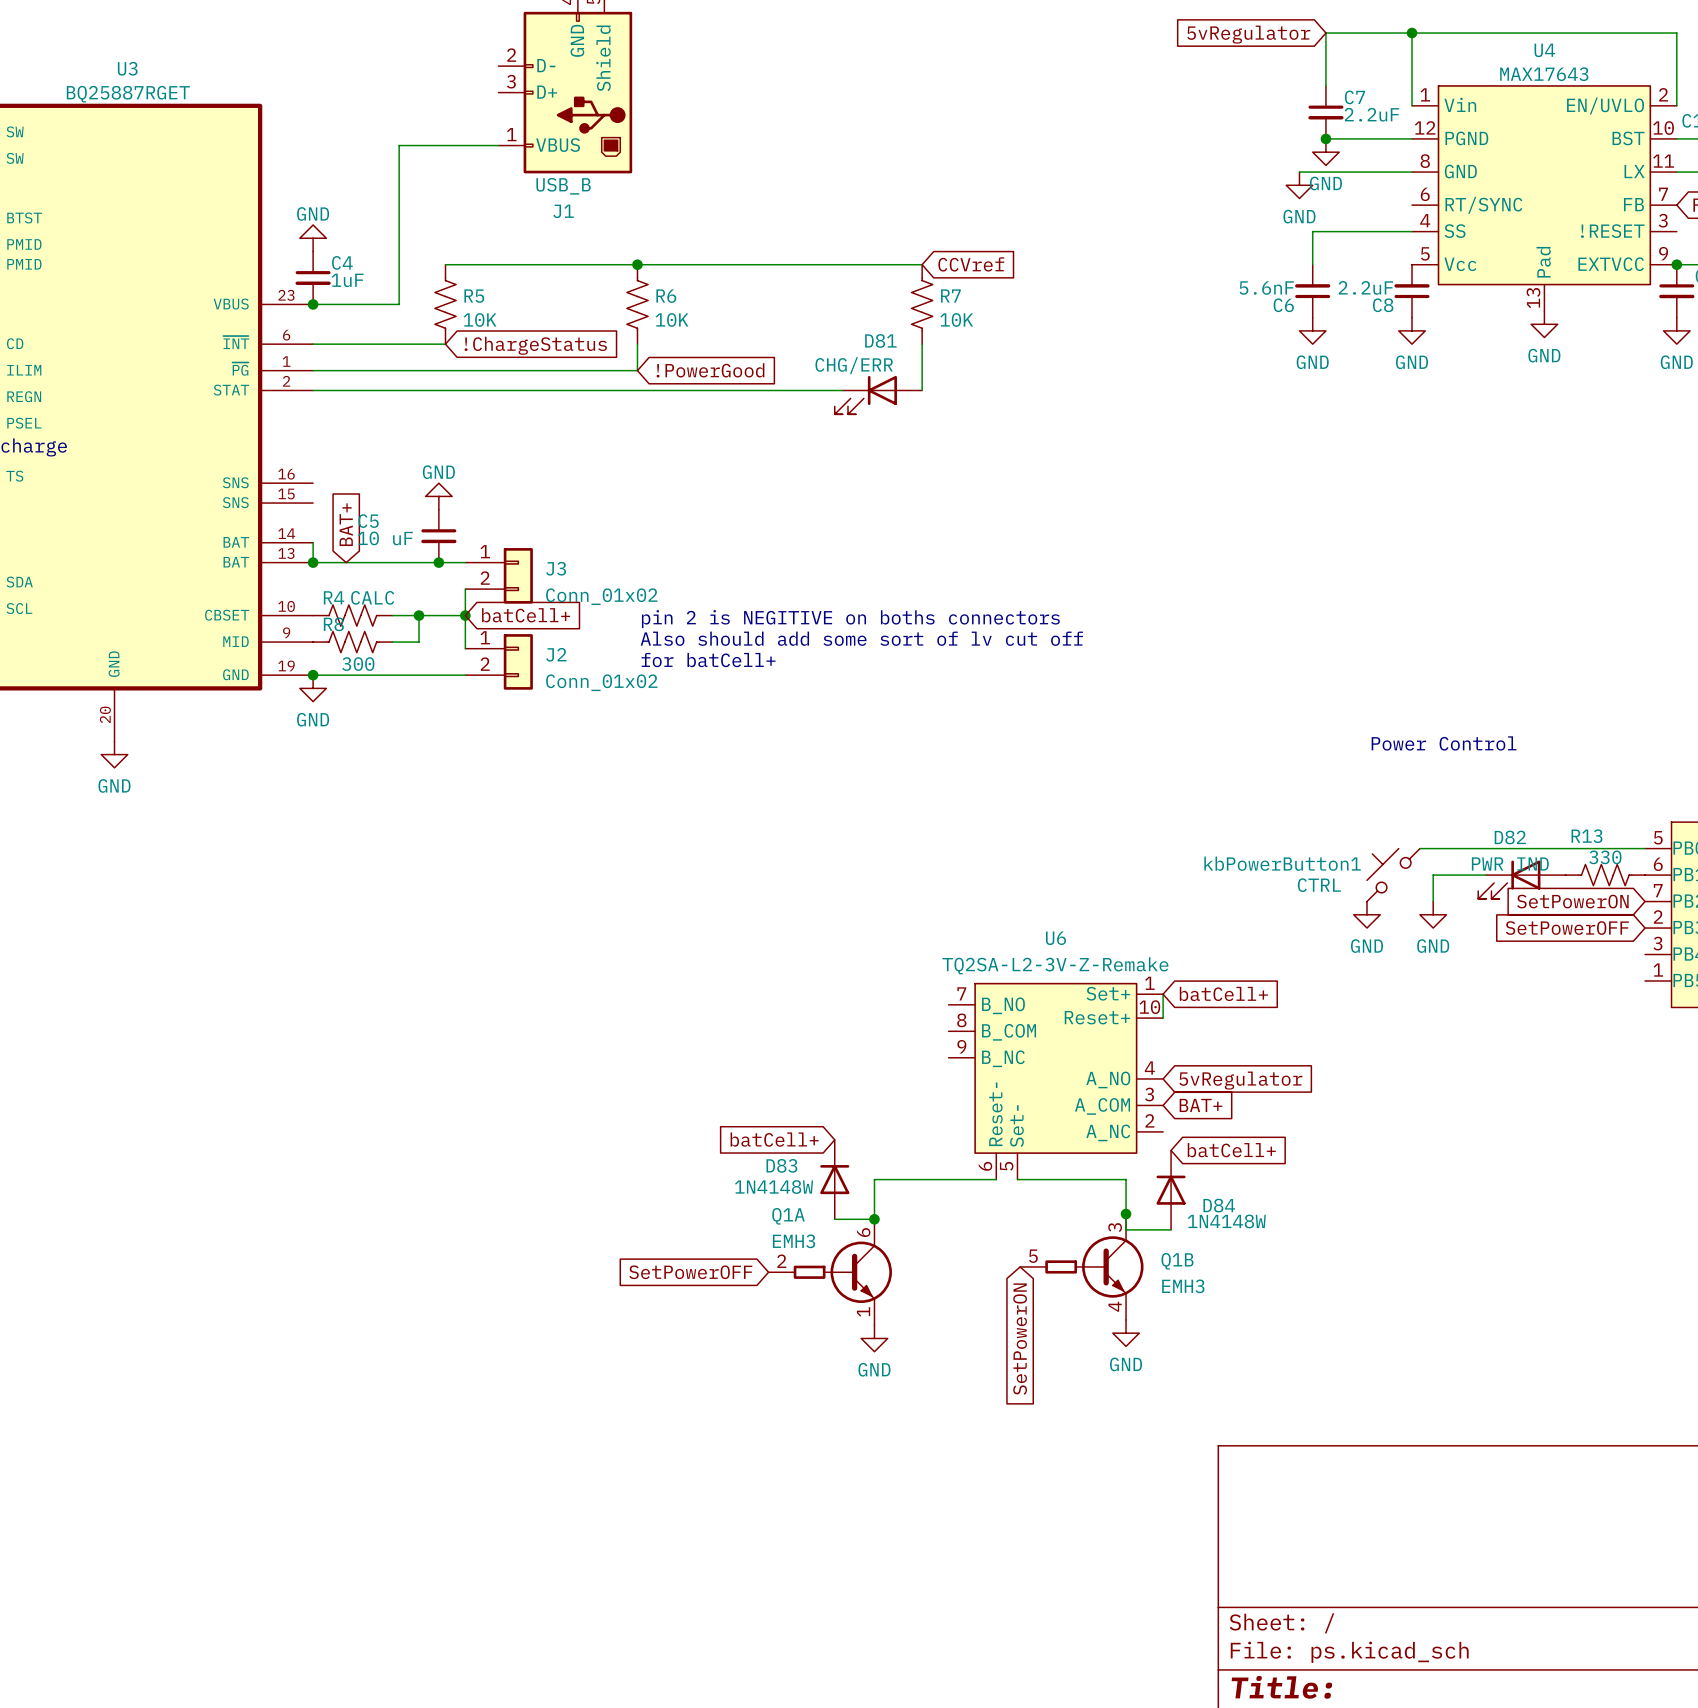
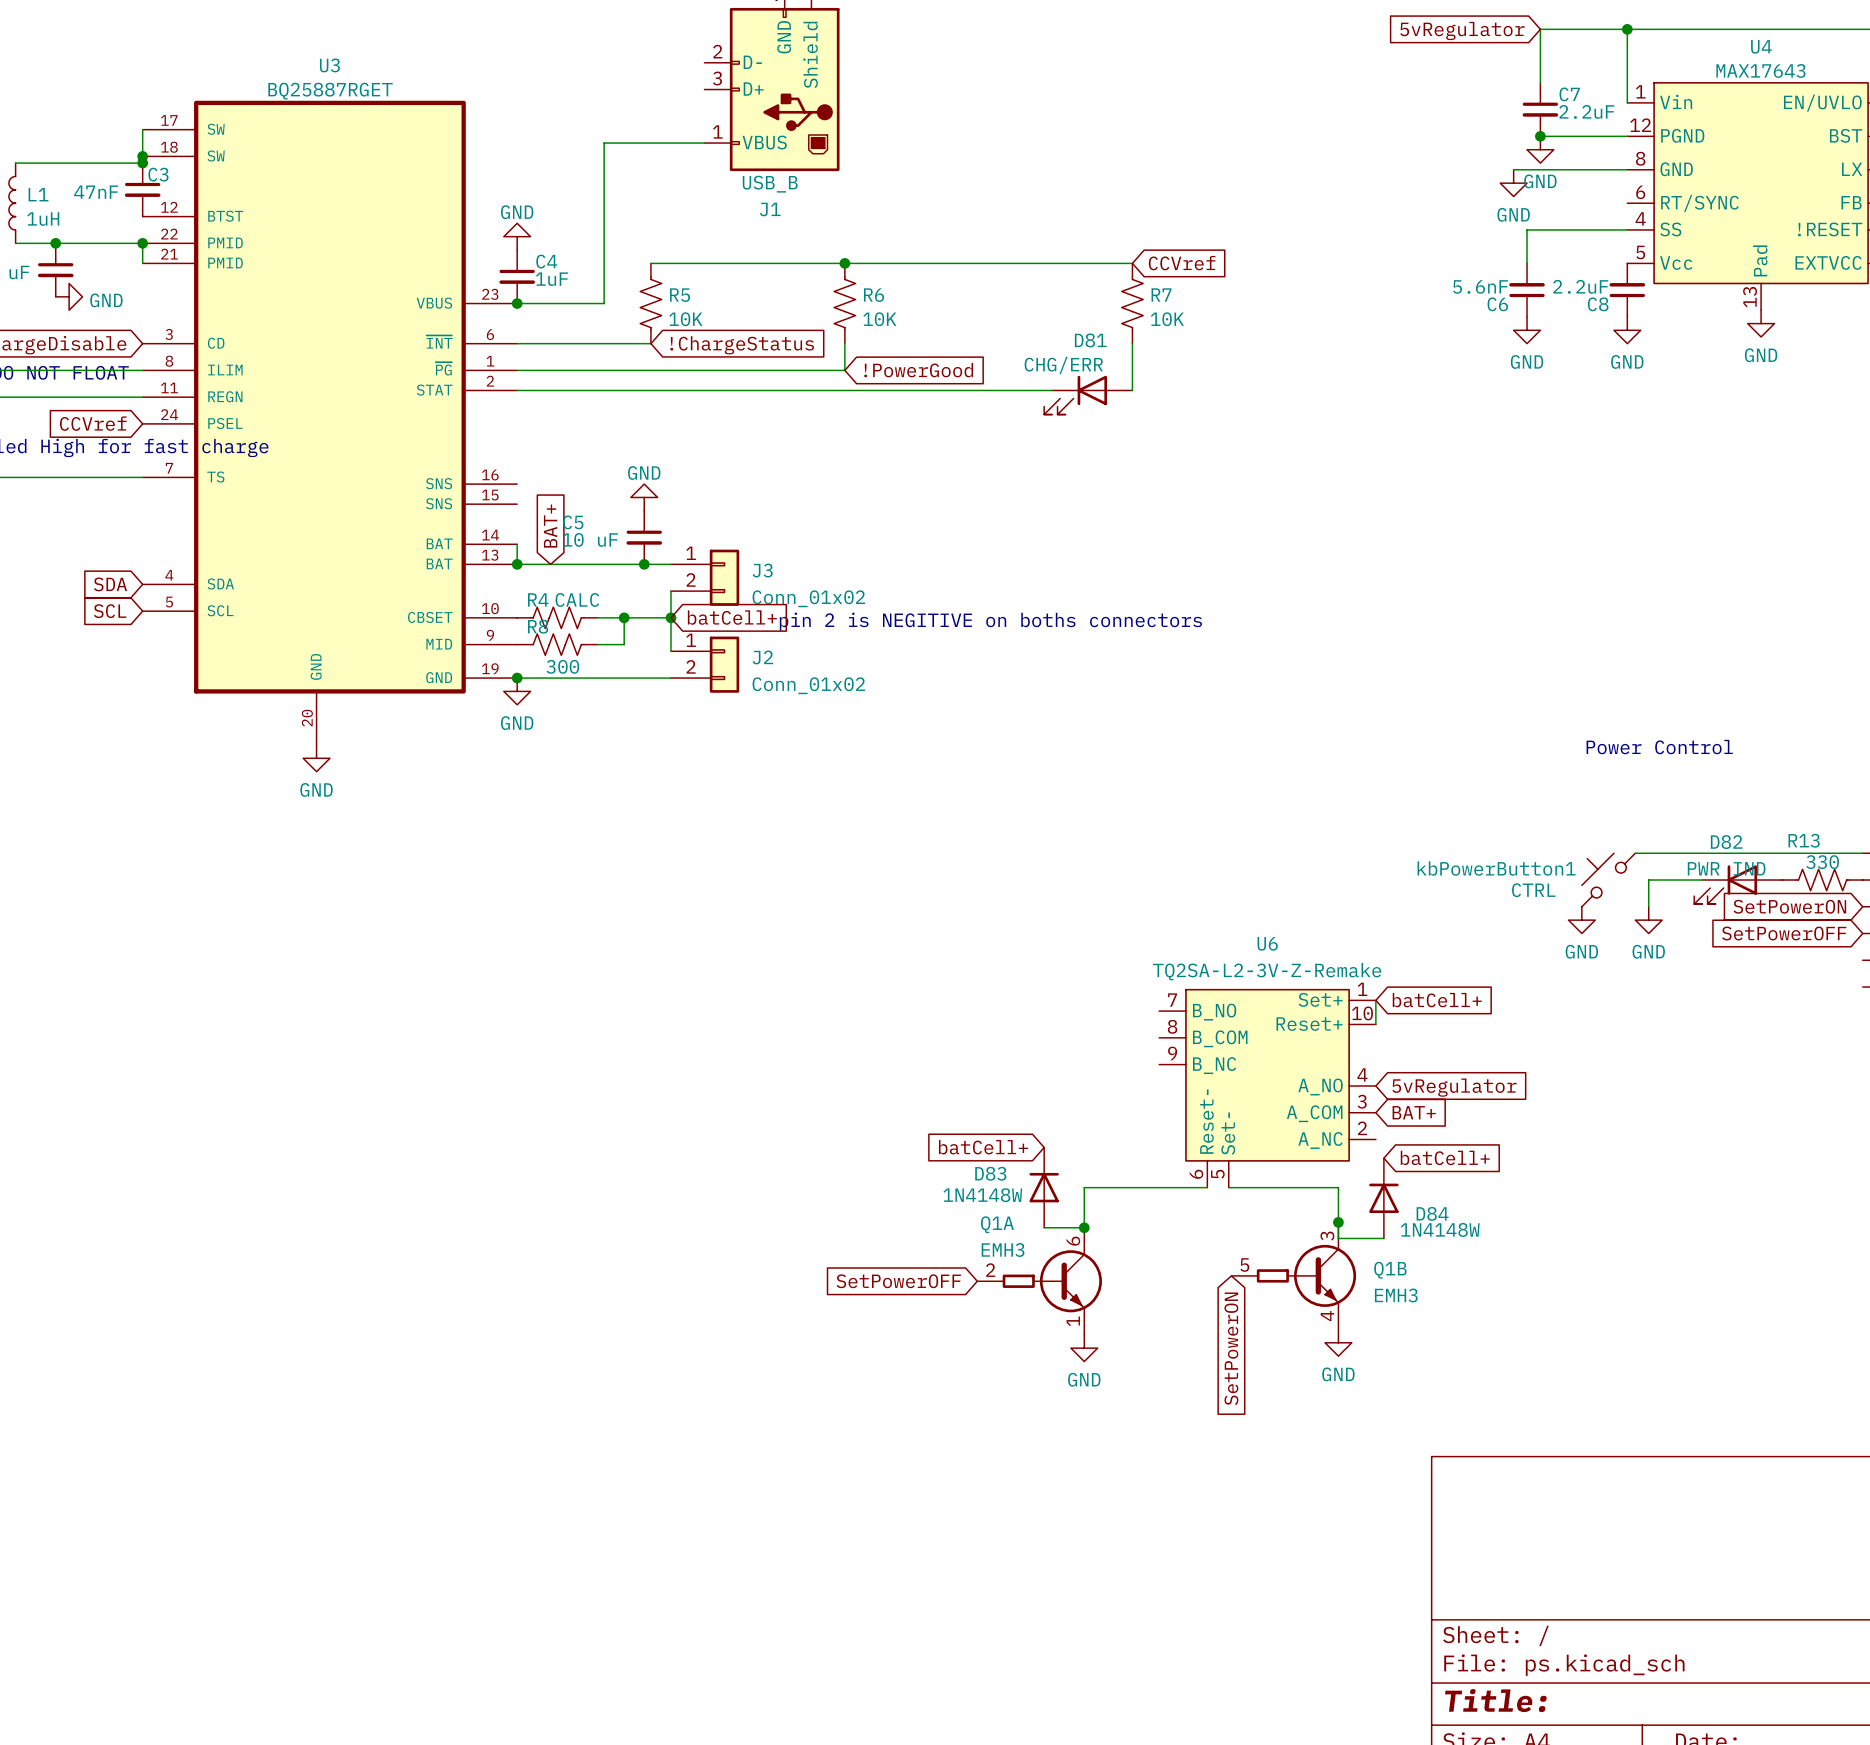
text position: pin 2 is NEGITIVE on boths connectors (850, 619) -> pin 2 is NEGITIVE on boths connectors (990, 621)
text: Also should add some sort of lv cut off (861, 638) -> none
text: for batCell+ (708, 660) -> none

